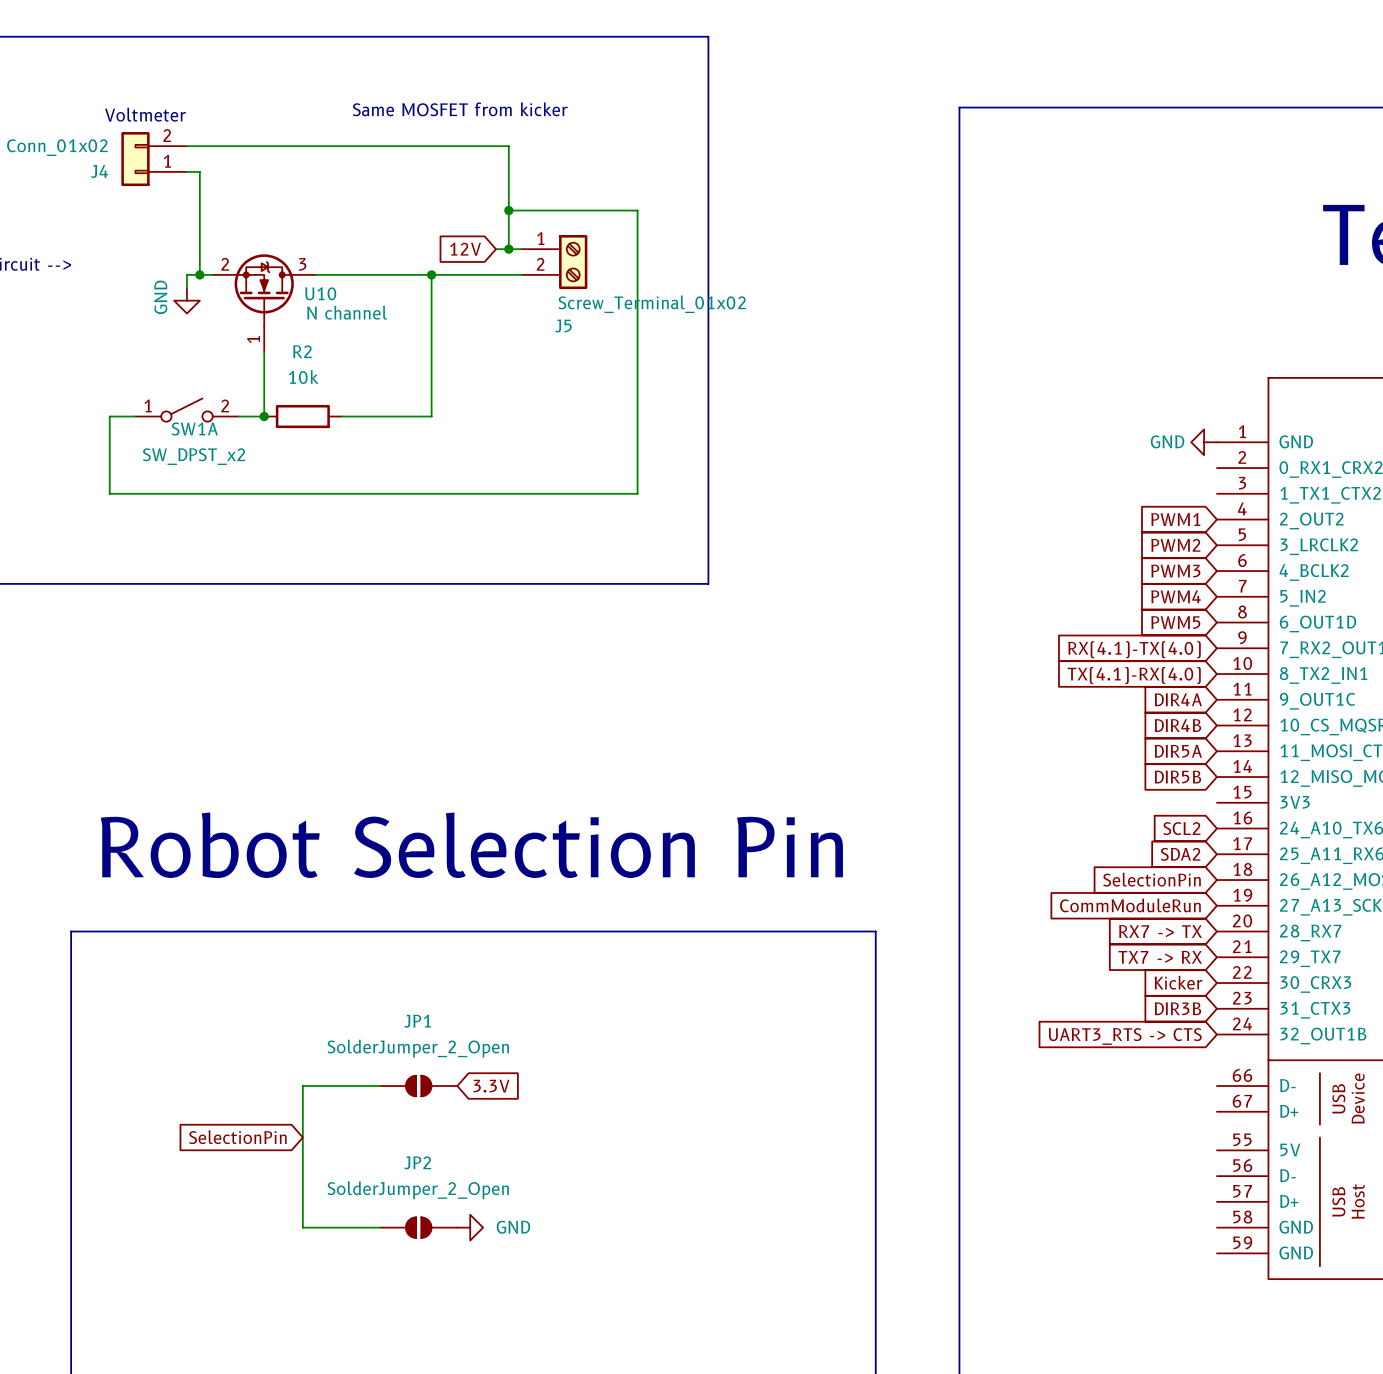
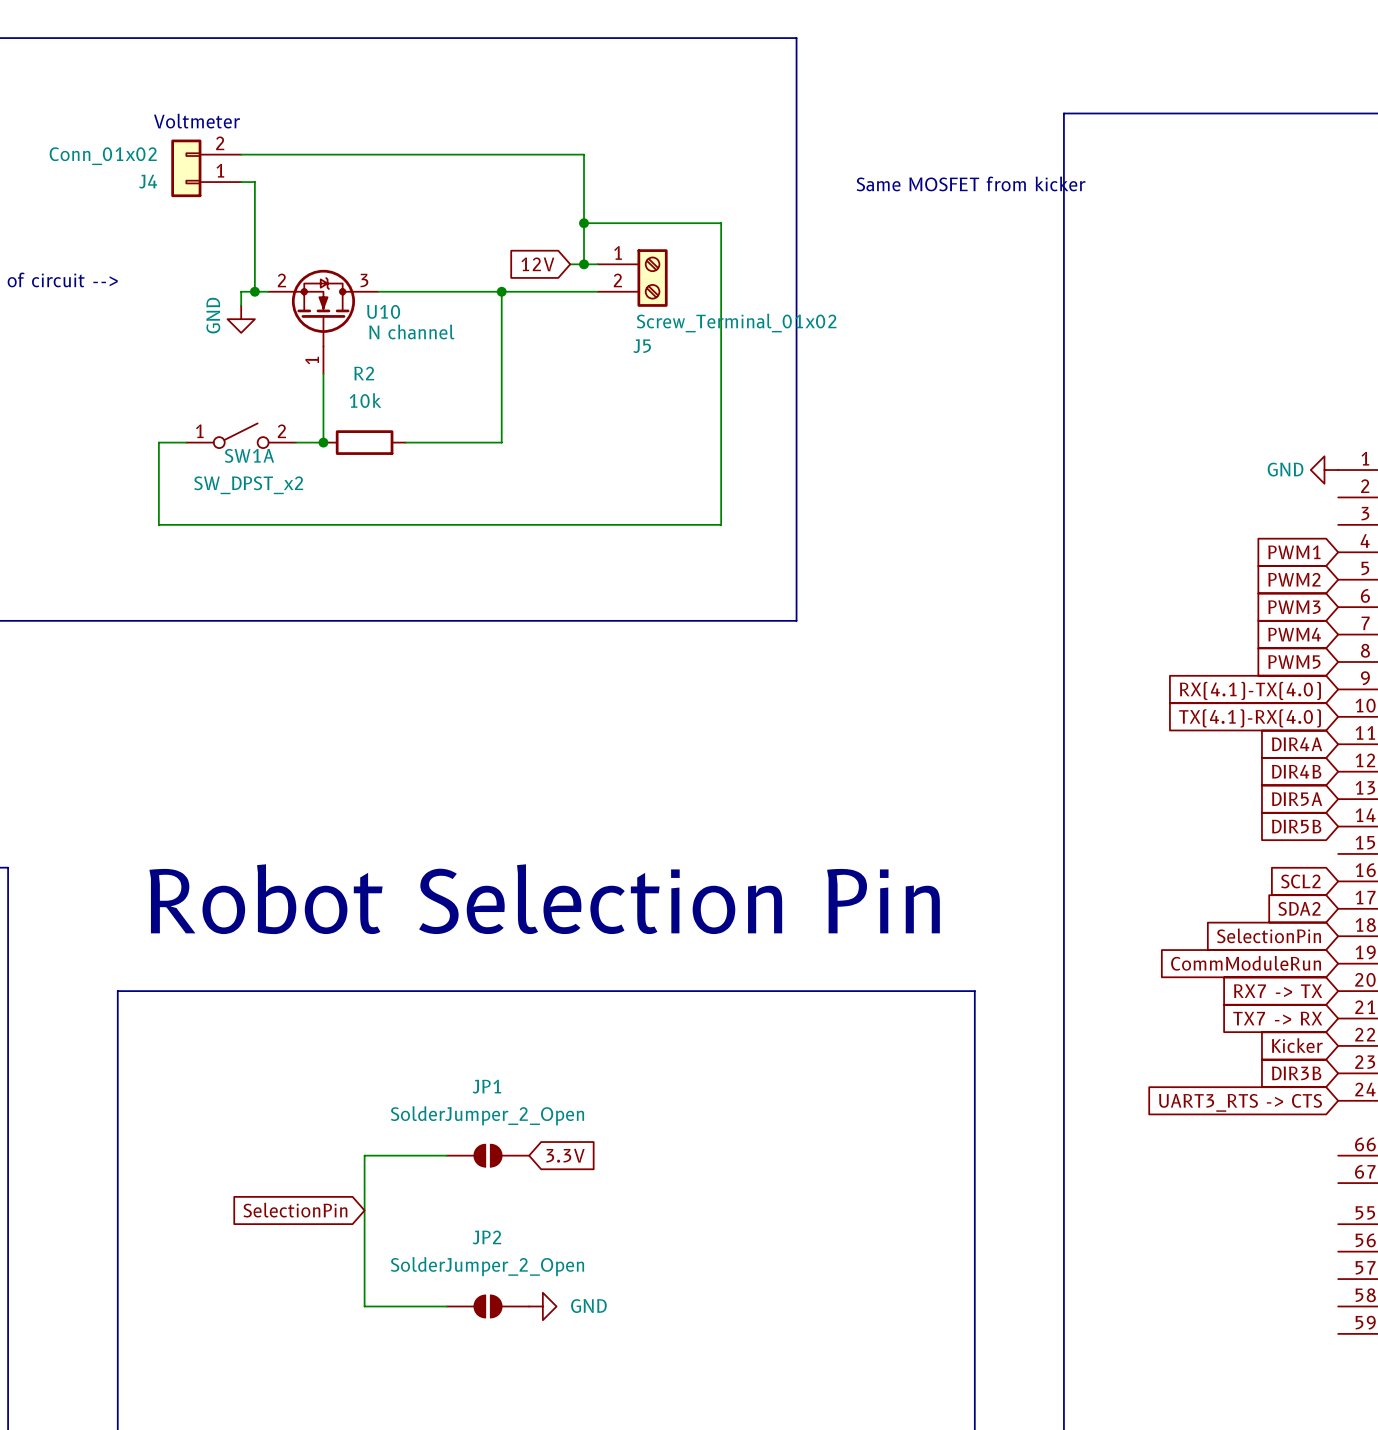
text: Same MOSFET from kicker (460, 109) -> none
text: none -> Same MOSFET from kicker (971, 183)

